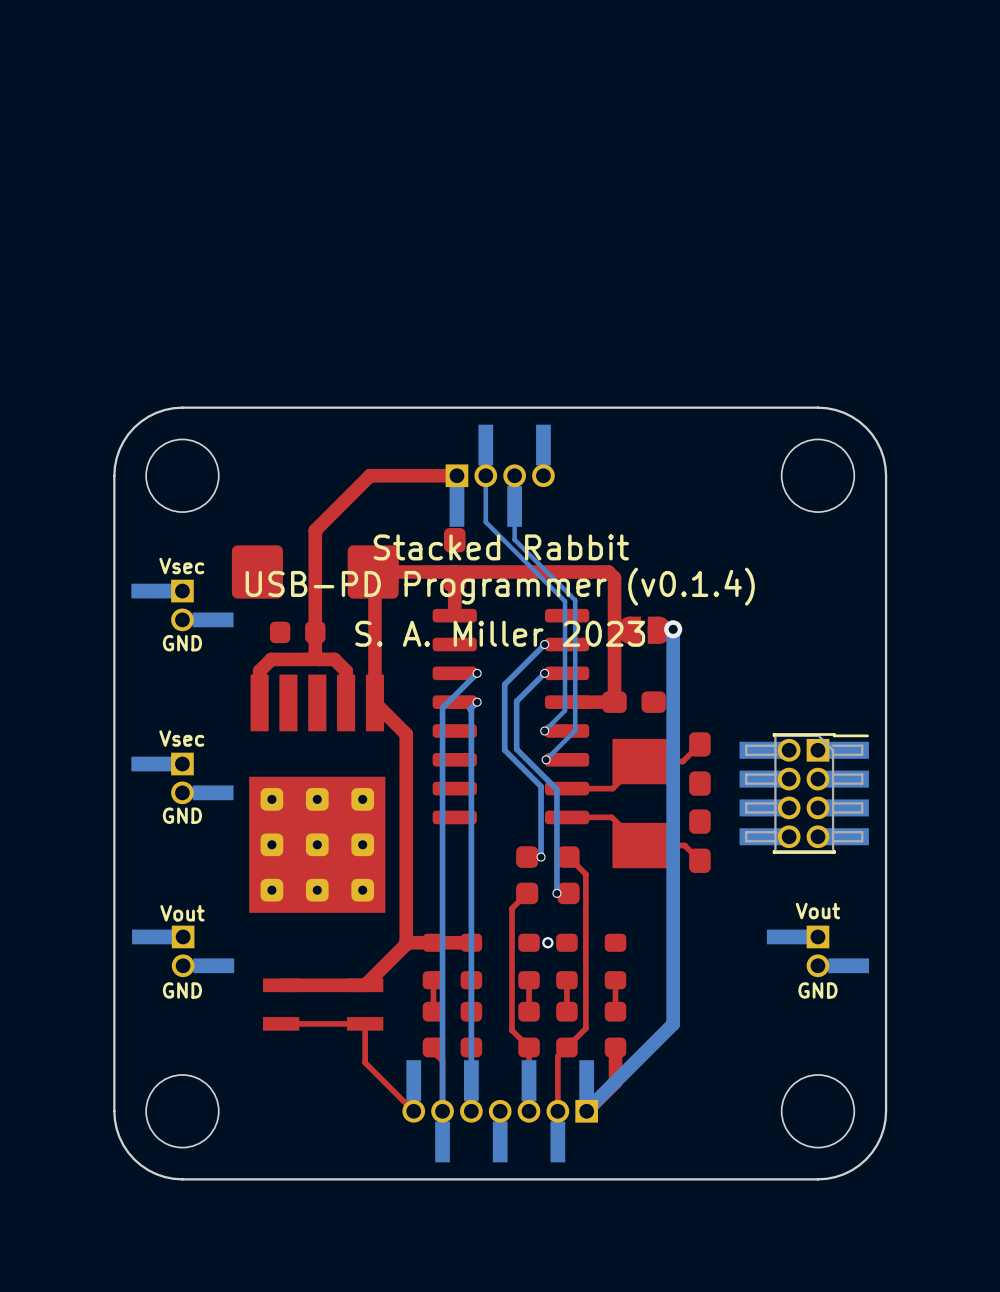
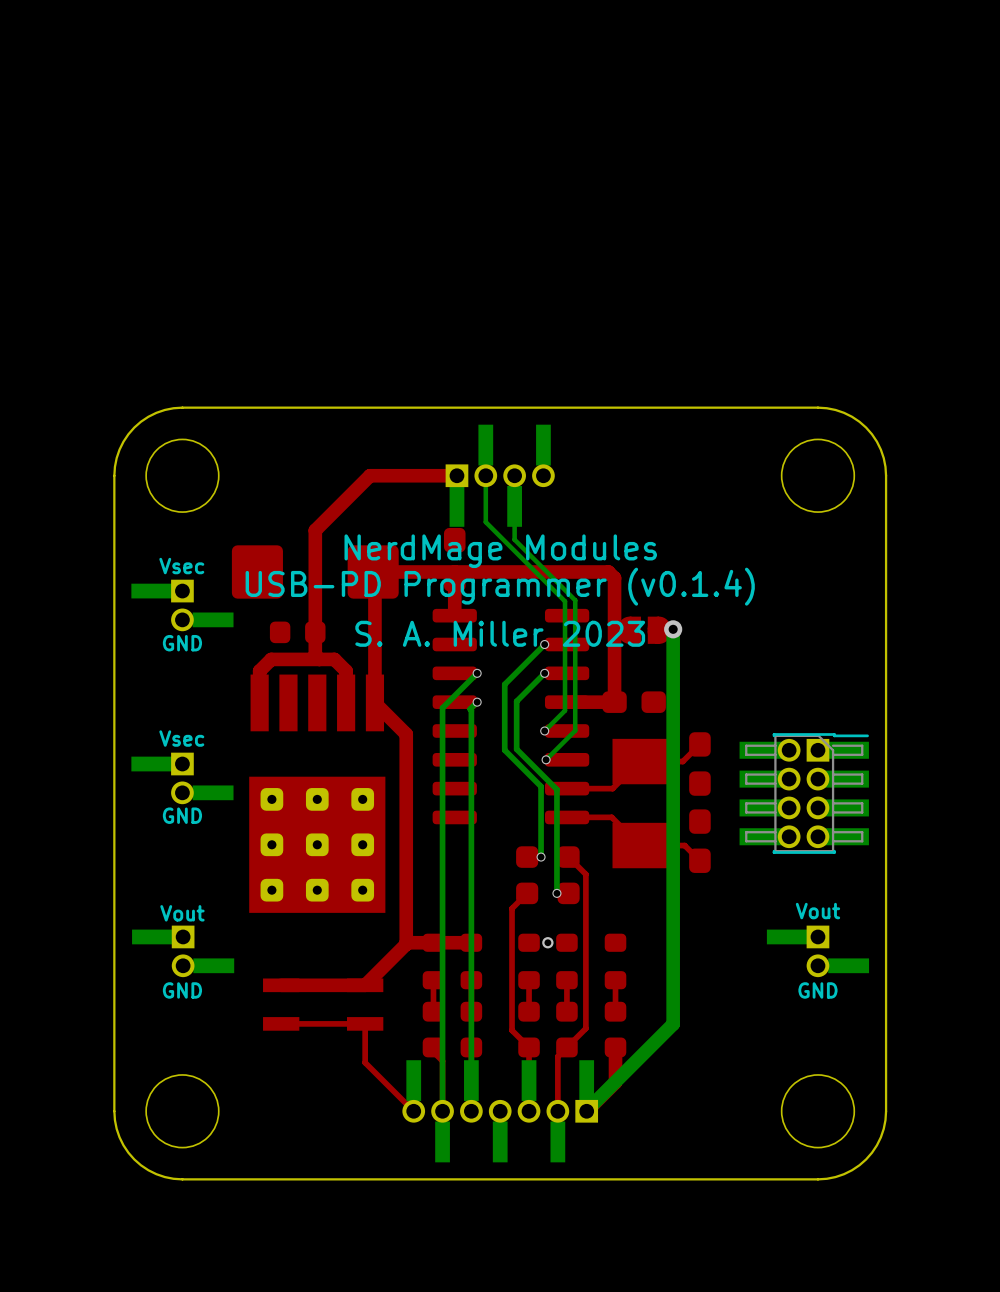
text: Stacked Rabbit (501, 547) -> NerdMage Modules (500, 551)

